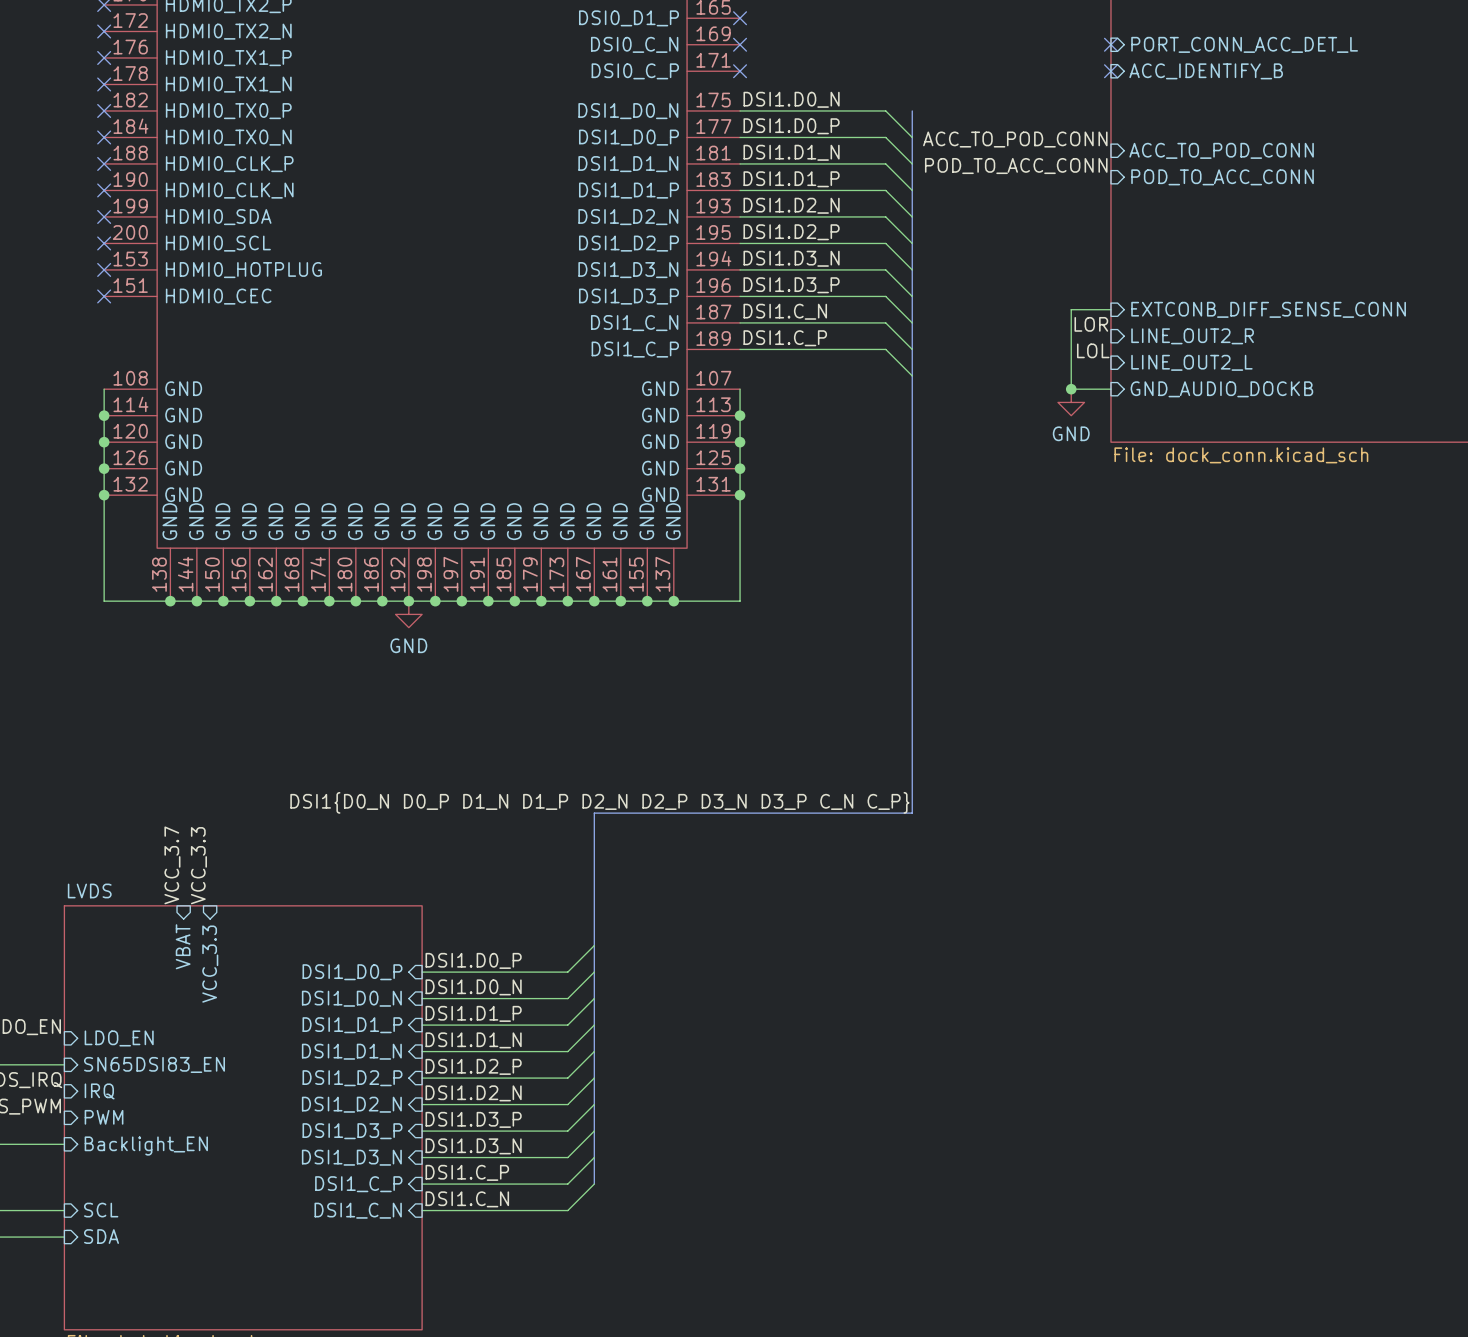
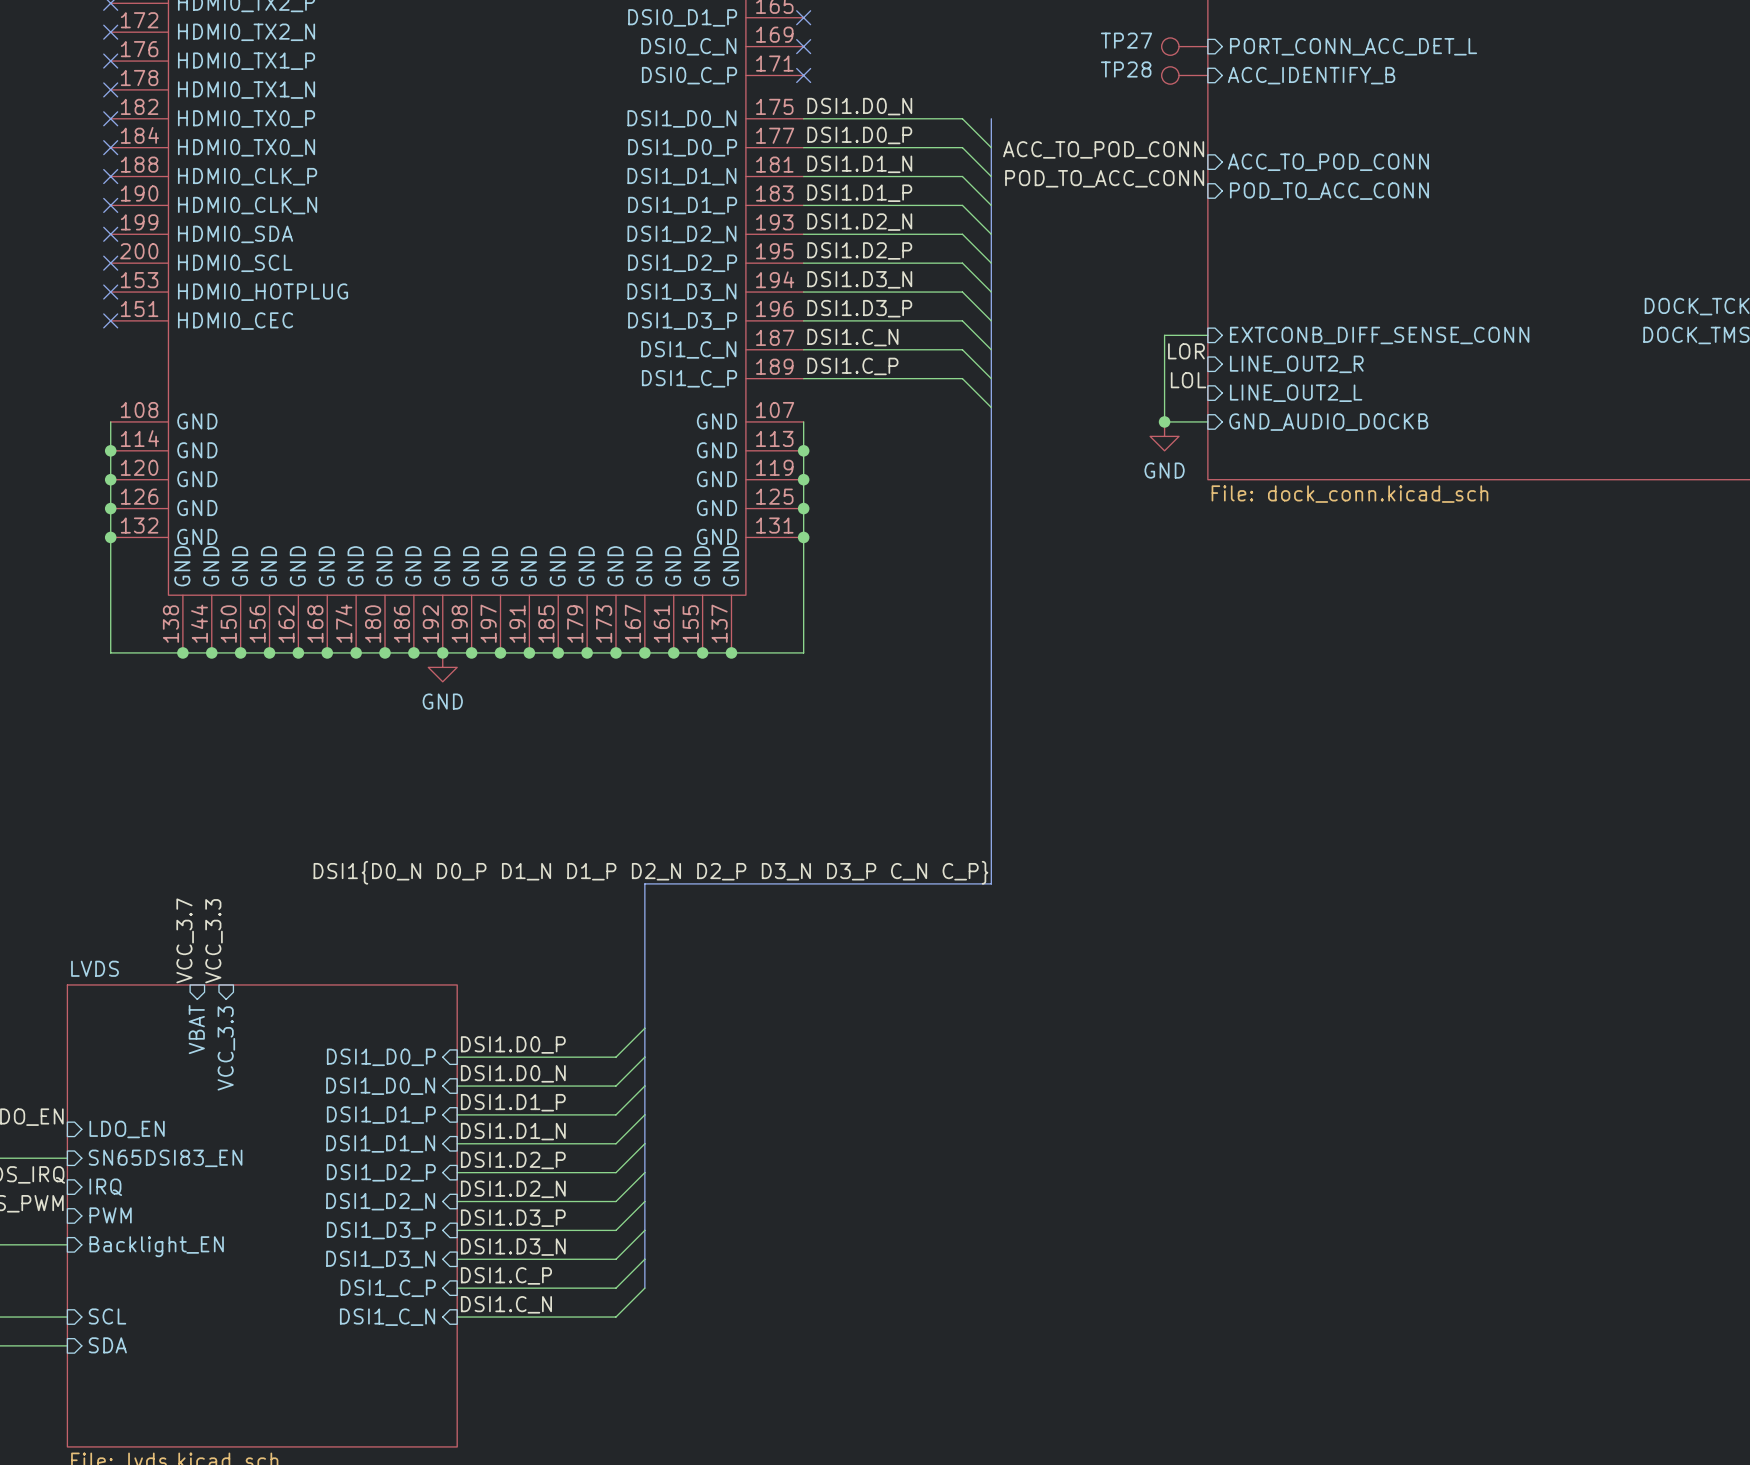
TP27: none -> (1184, 46)
no-connect mark: (1110, 44) -> none
TP28: none -> (1184, 75)
no-connect mark: (1110, 71) -> none

